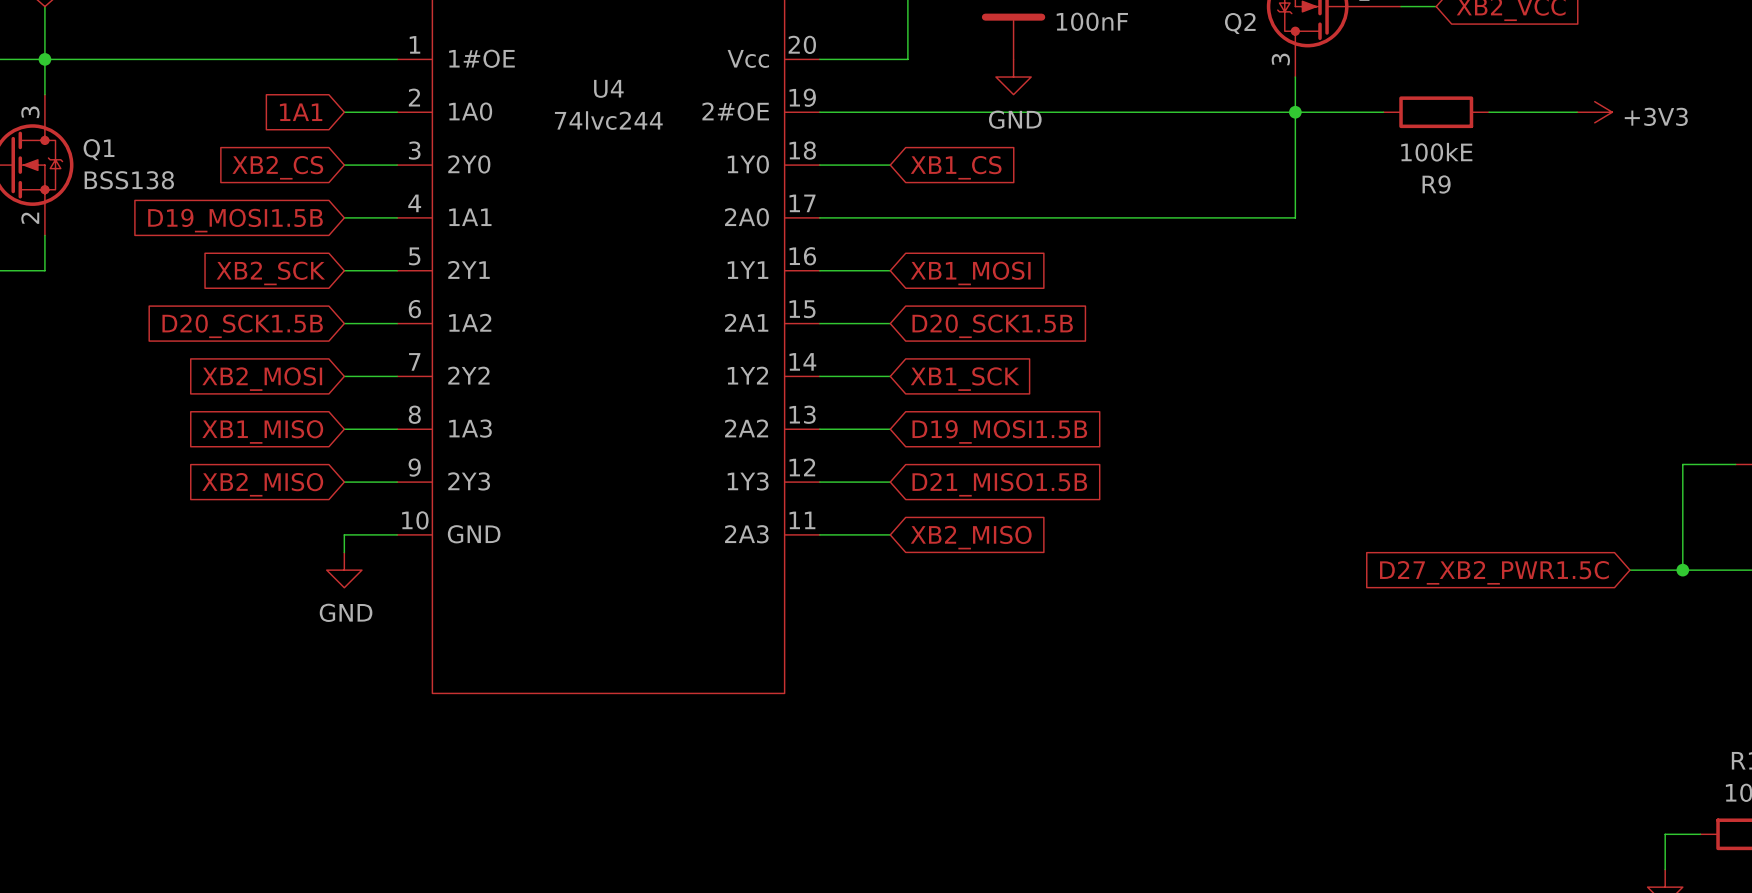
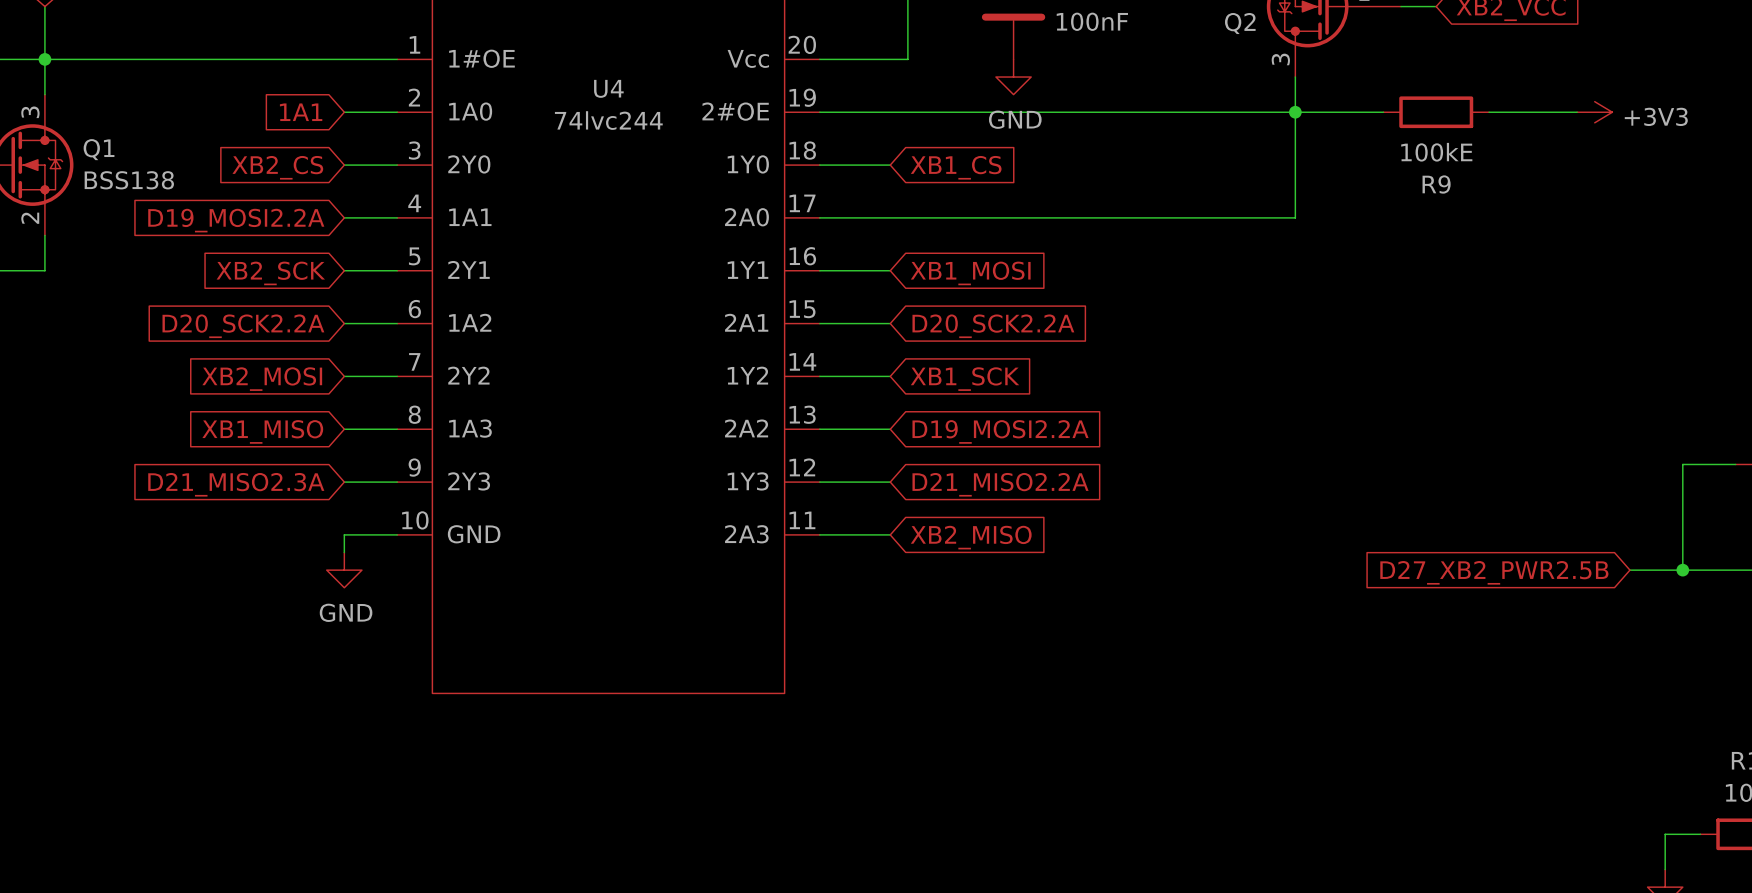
global label: D19_MOSI1.5B (235, 220) -> D19_MOSI2.2A (236, 220)
global label: D20_SCK1.5B (242, 326) -> D20_SCK2.2A (243, 326)
global label: D20_SCK1.5B (992, 326) -> D20_SCK2.2A (993, 326)
global label: D19_MOSI1.5B (999, 431) -> D19_MOSI2.2A (1000, 431)
global label: XB2_MISO (262, 484) -> D21_MISO2.3A (236, 484)
global label: D21_MISO1.5B (999, 484) -> D21_MISO2.2A (1000, 484)
global label: D27_XB2_PWR1.5C (1494, 572) -> D27_XB2_PWR2.5B (1494, 572)

